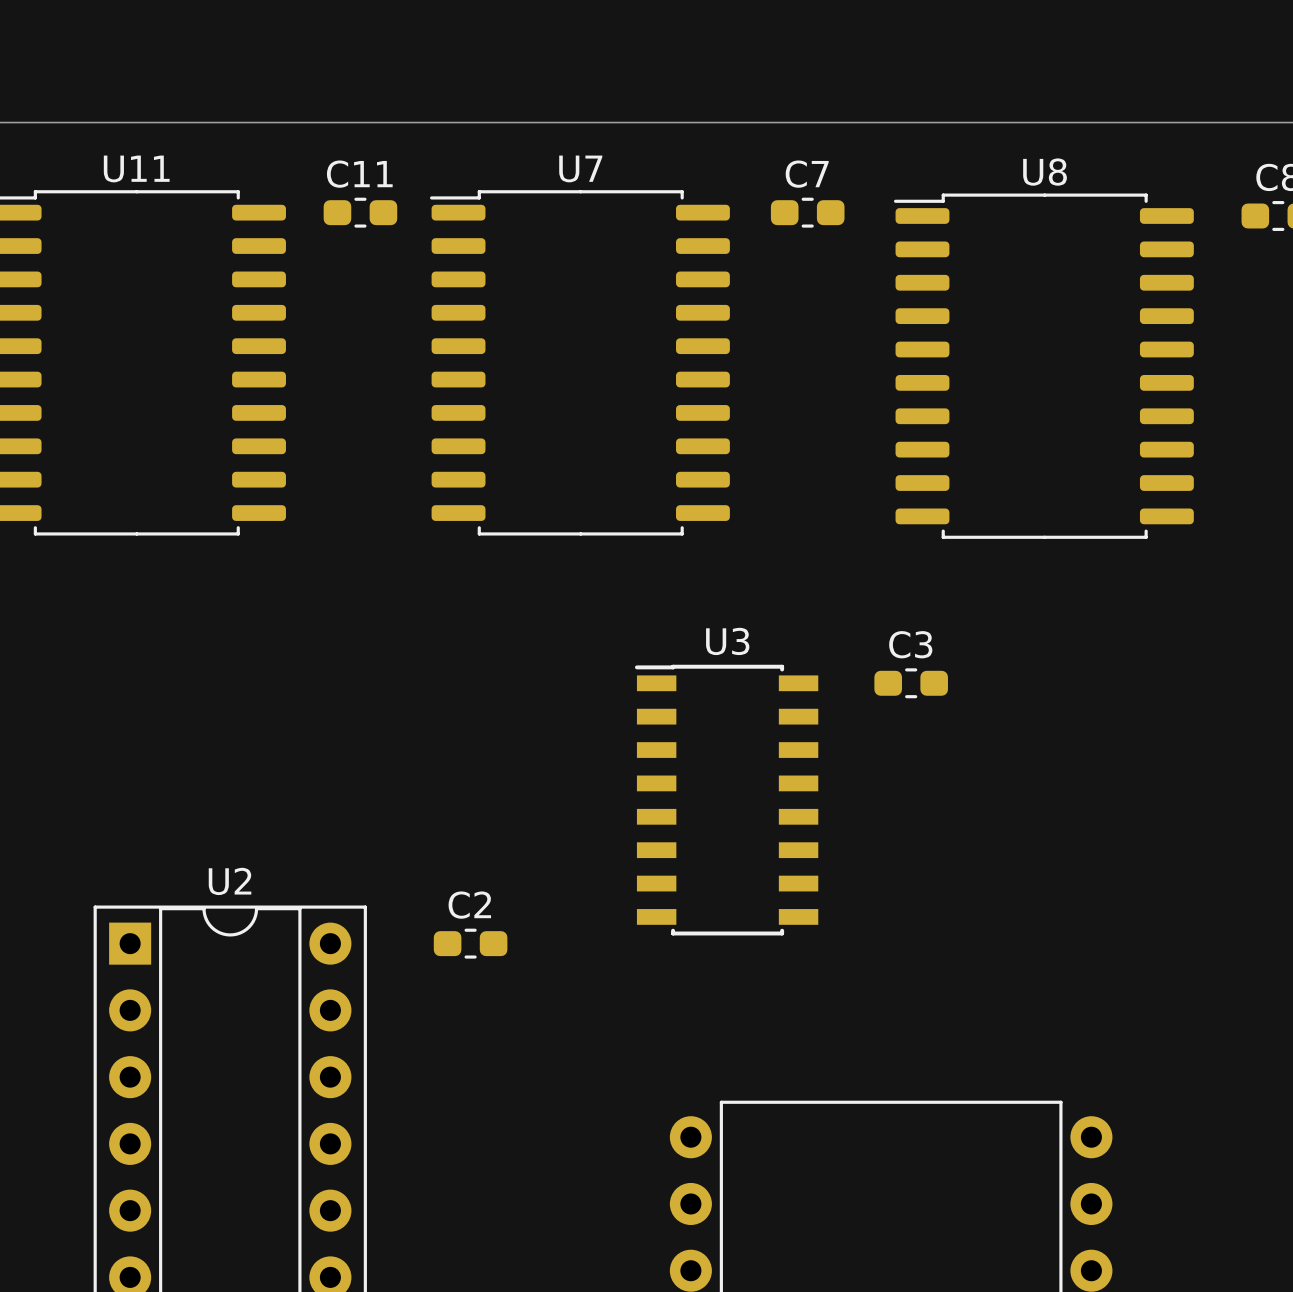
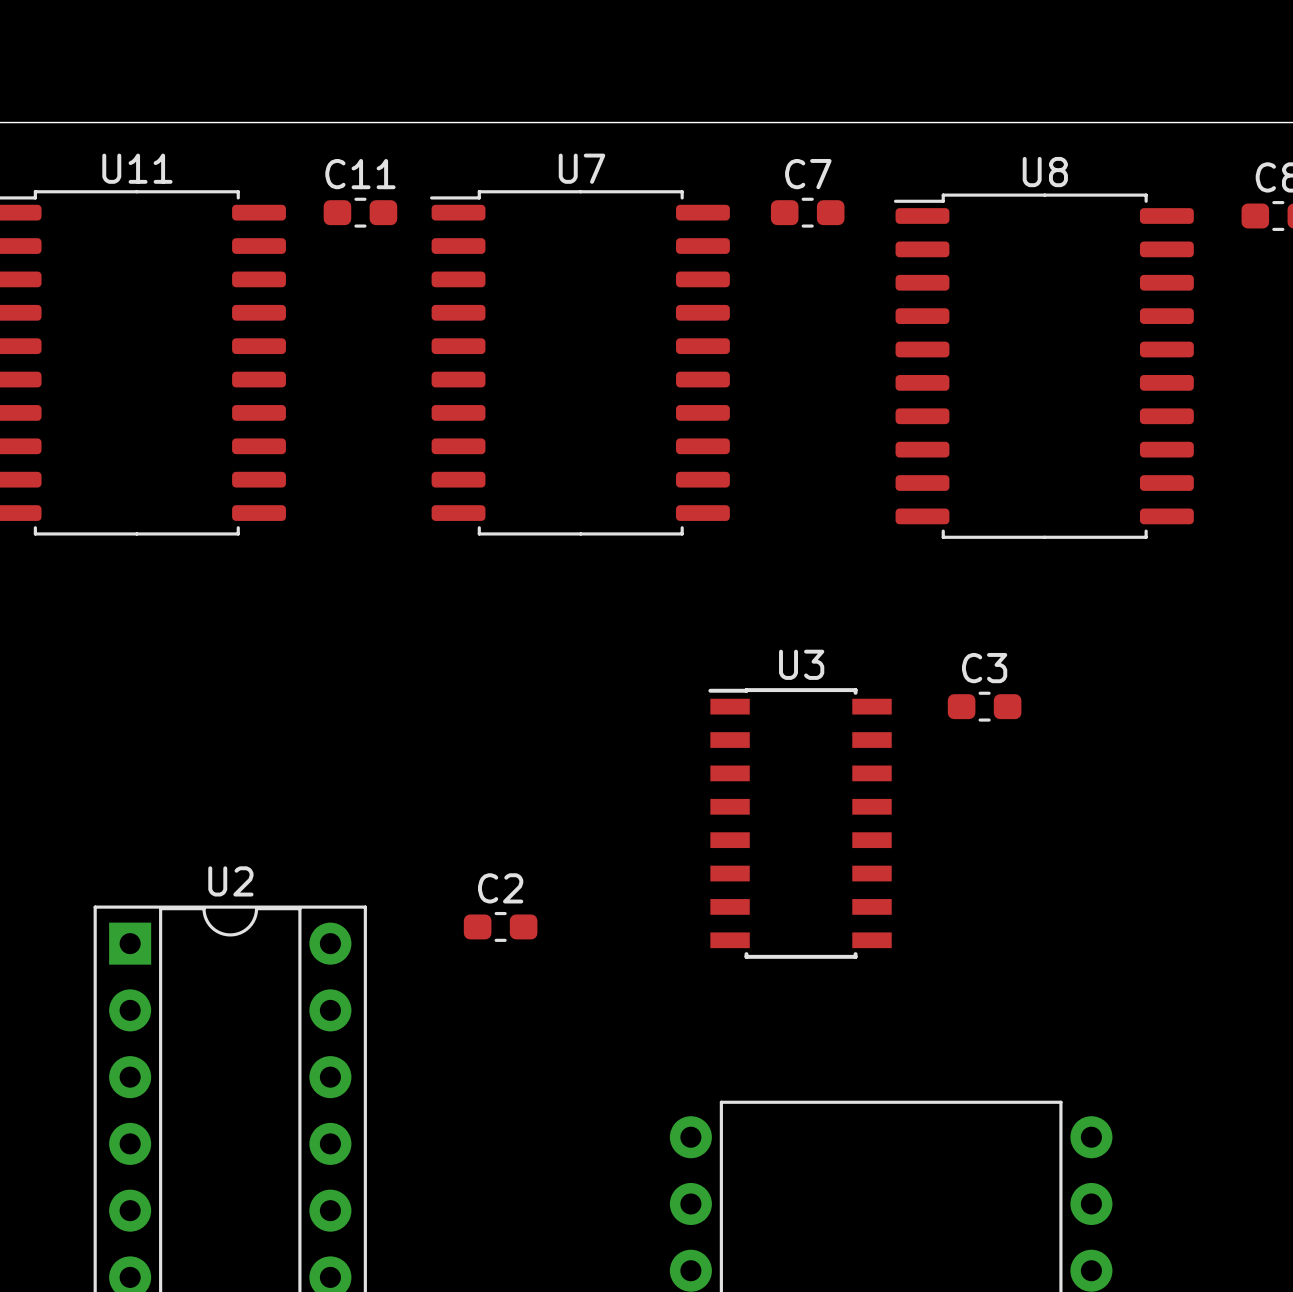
C3 position: (911, 683) -> (984, 706)
U3 position: (726, 800) -> (800, 823)
C2 position: (470, 943) -> (500, 926)

